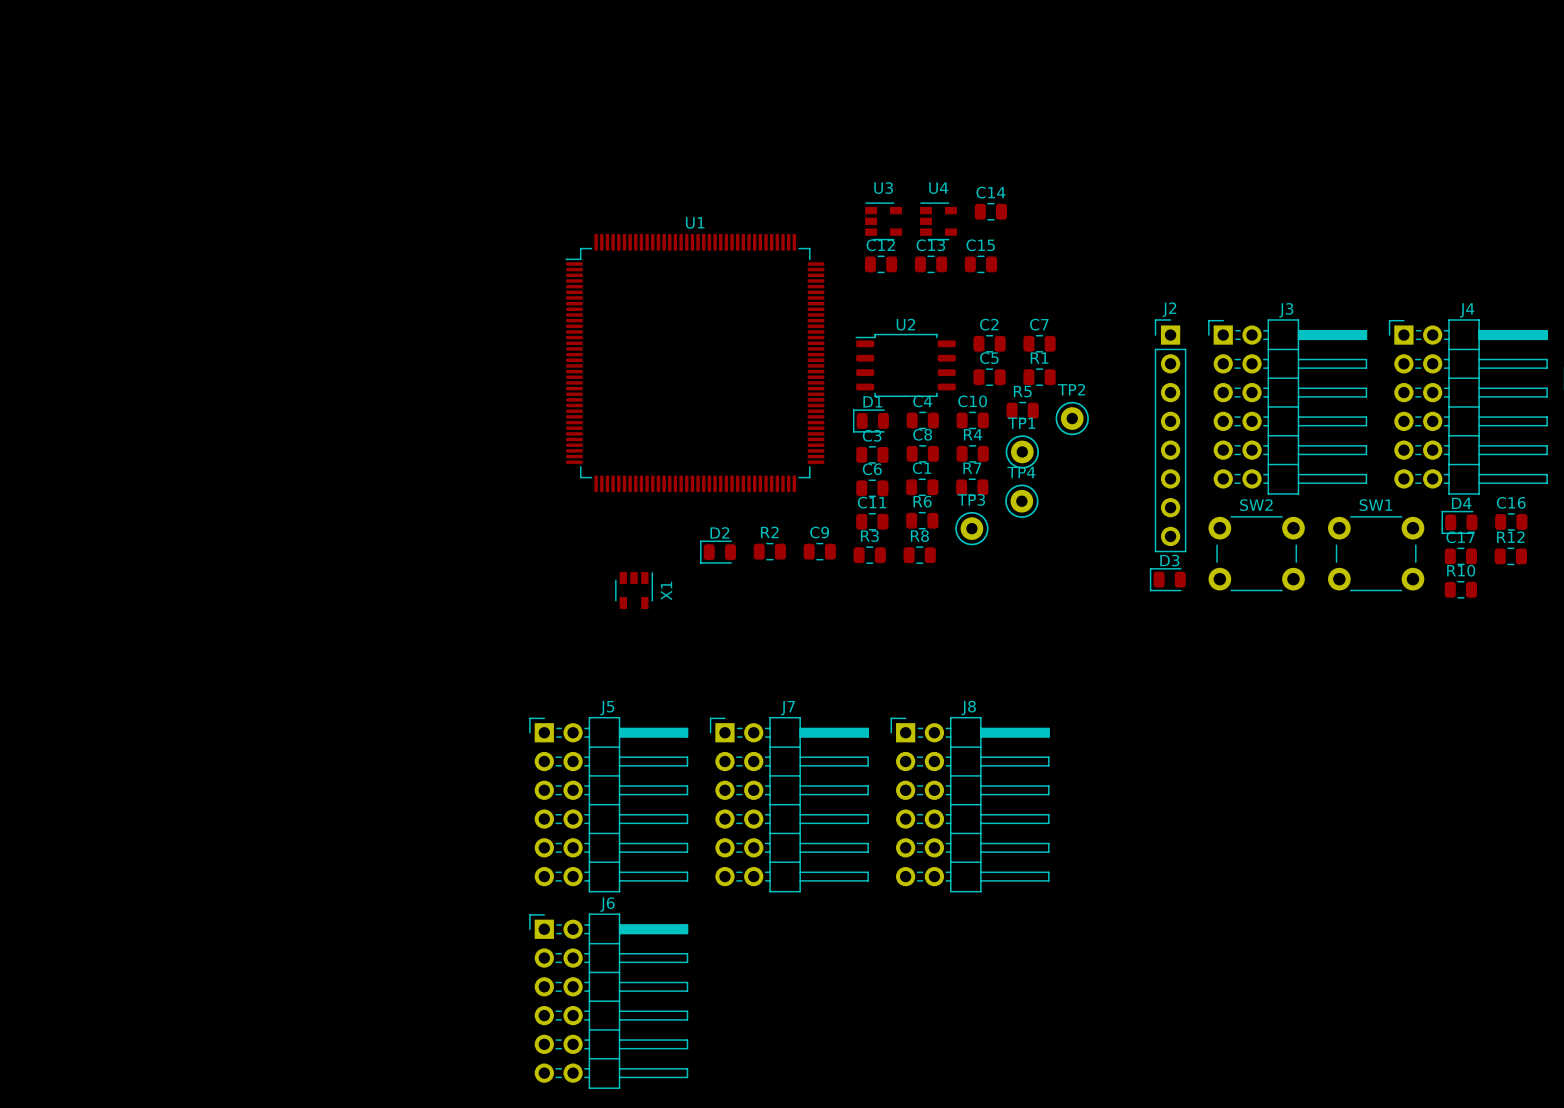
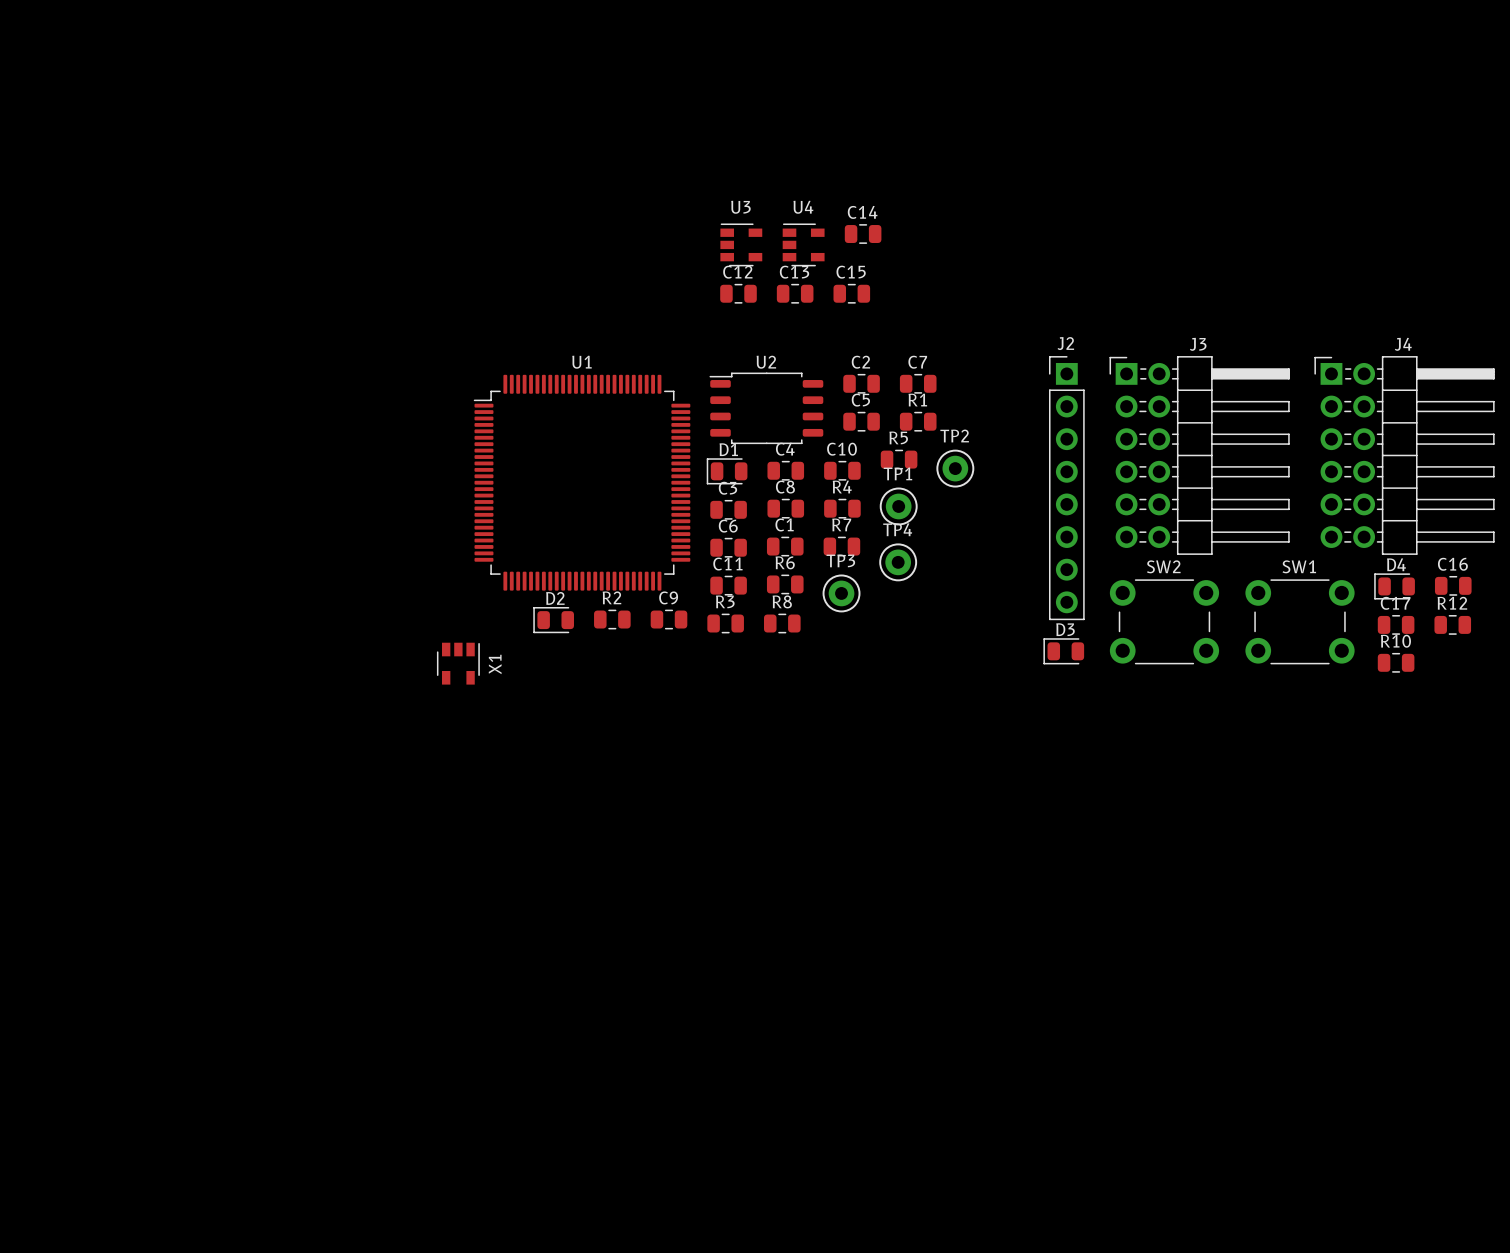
U1 name position: U1 (695, 222) -> U1 (581, 362)
U1 footprint: [565, 233, 825, 493] -> [473, 374, 691, 591]
J5: (608, 804) -> none
J7: (789, 804) -> none
J8: (970, 804) -> none
J6: (608, 1001) -> none

